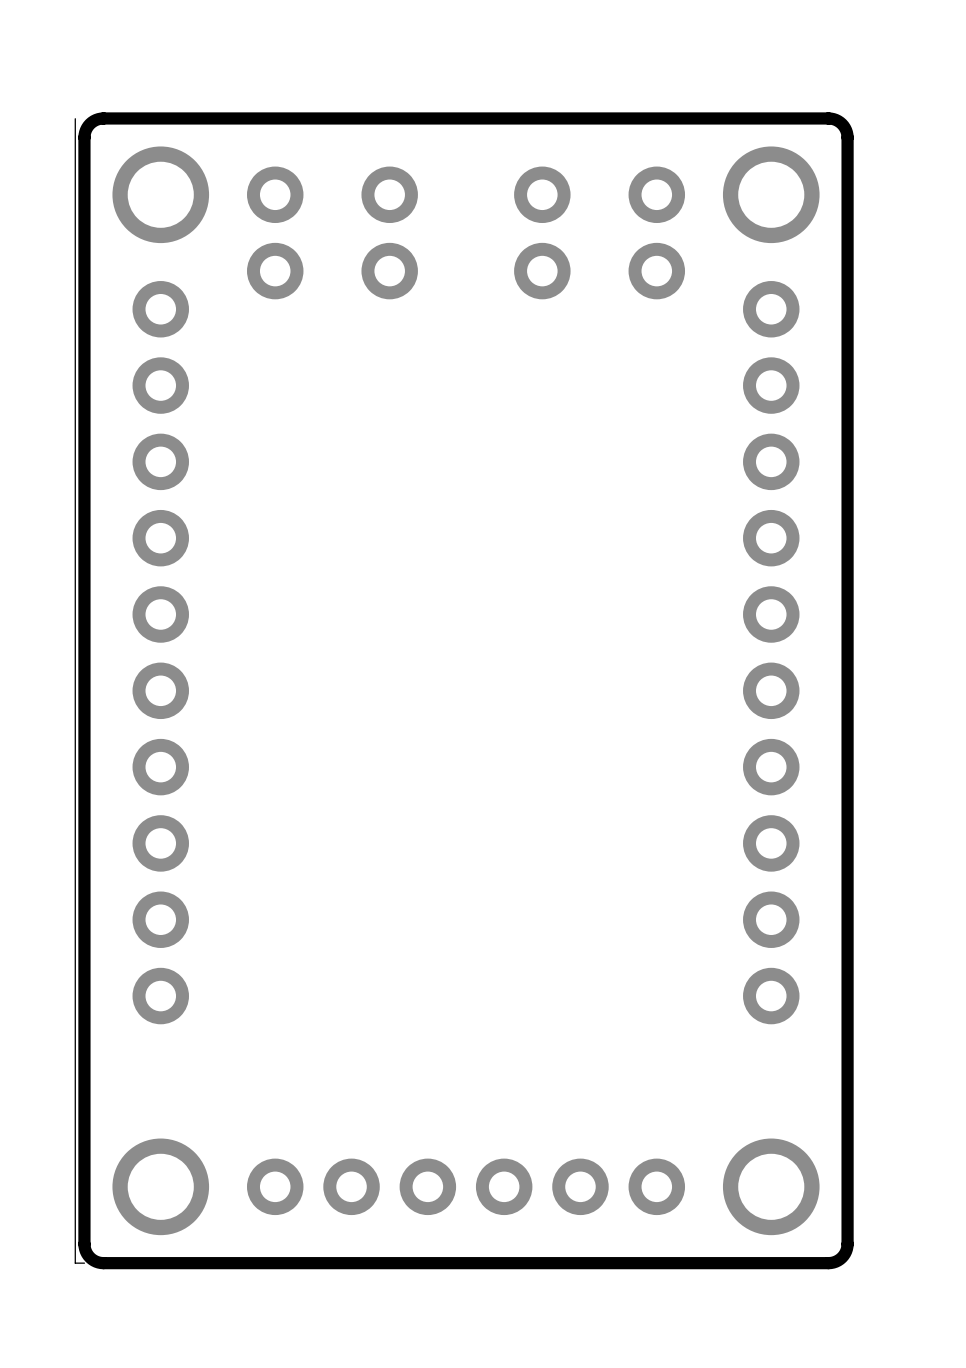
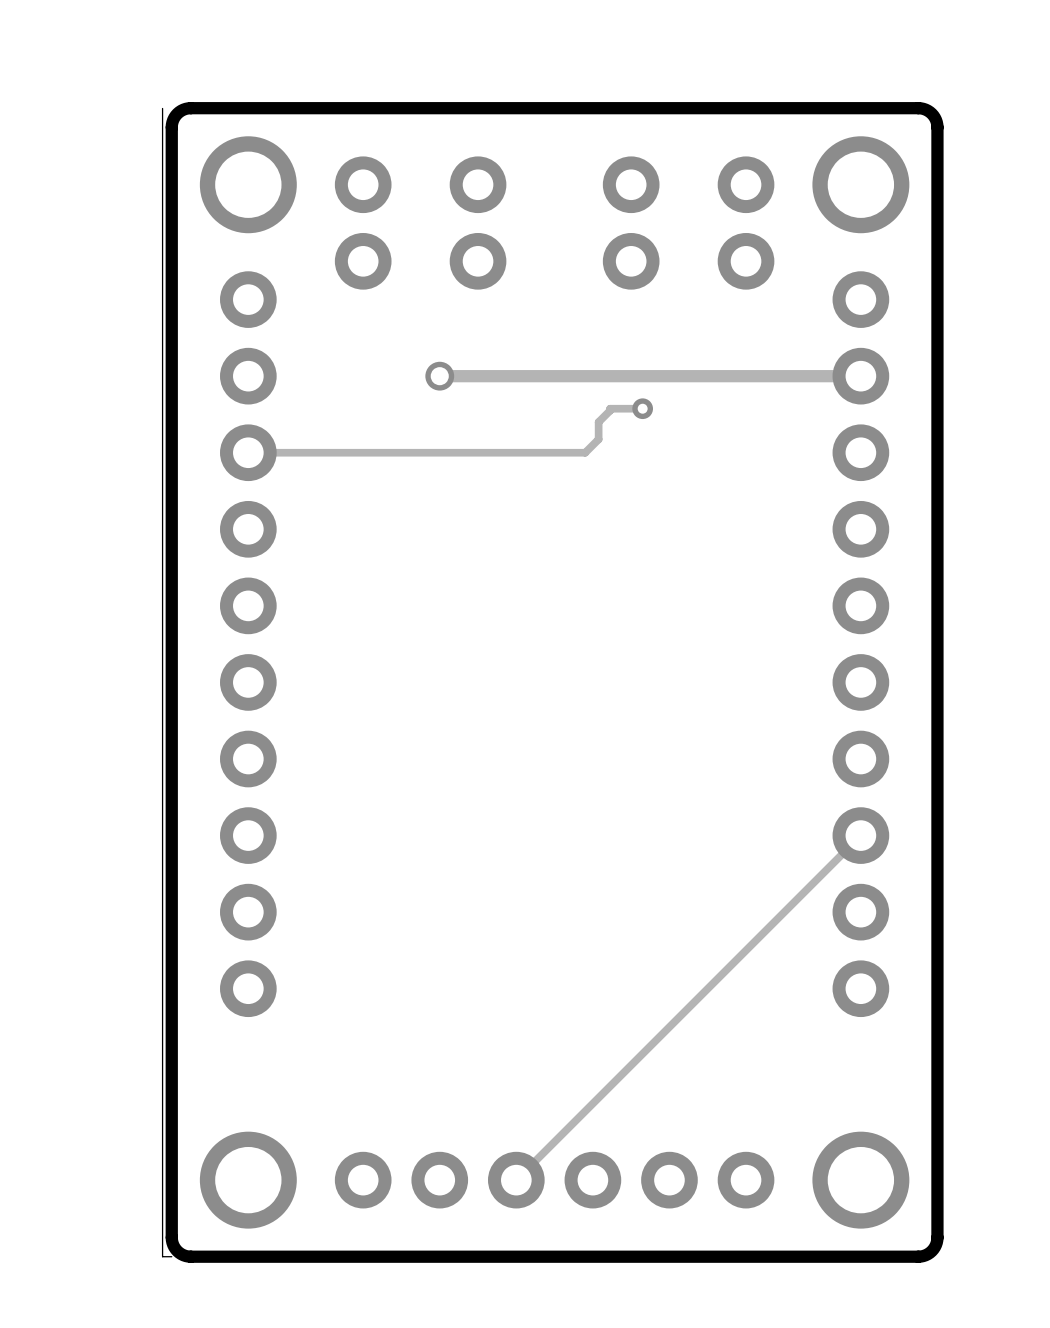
via: none -> (439, 376)
track: none -> (860, 376) (439, 376)
track: none -> (642, 408) (610, 408) (598, 422) (598, 439) (585, 452) (248, 452)
via: none -> (642, 408)
track: none -> (860, 835) (516, 1180)

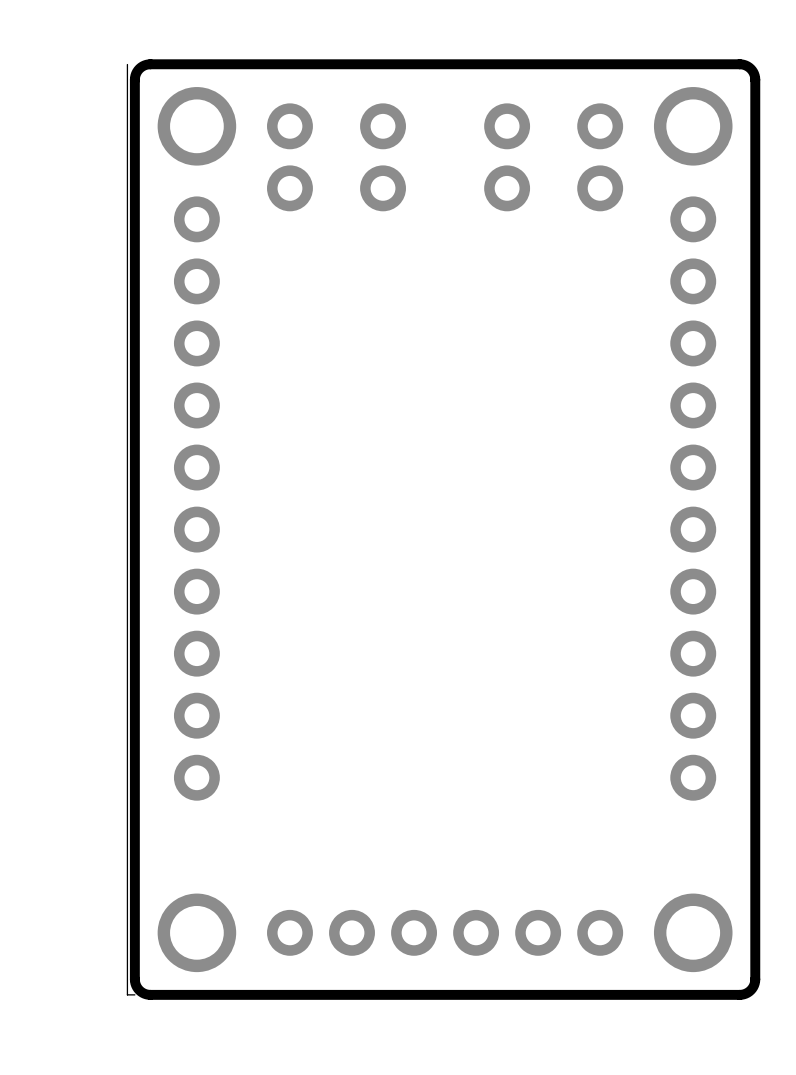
via: (439, 376) -> none
track: (860, 376) (439, 376) -> none
track: (642, 408) (610, 408) (598, 422) (598, 439) (585, 452) (248, 452) -> none
via: (642, 408) -> none
track: (860, 835) (516, 1180) -> none

